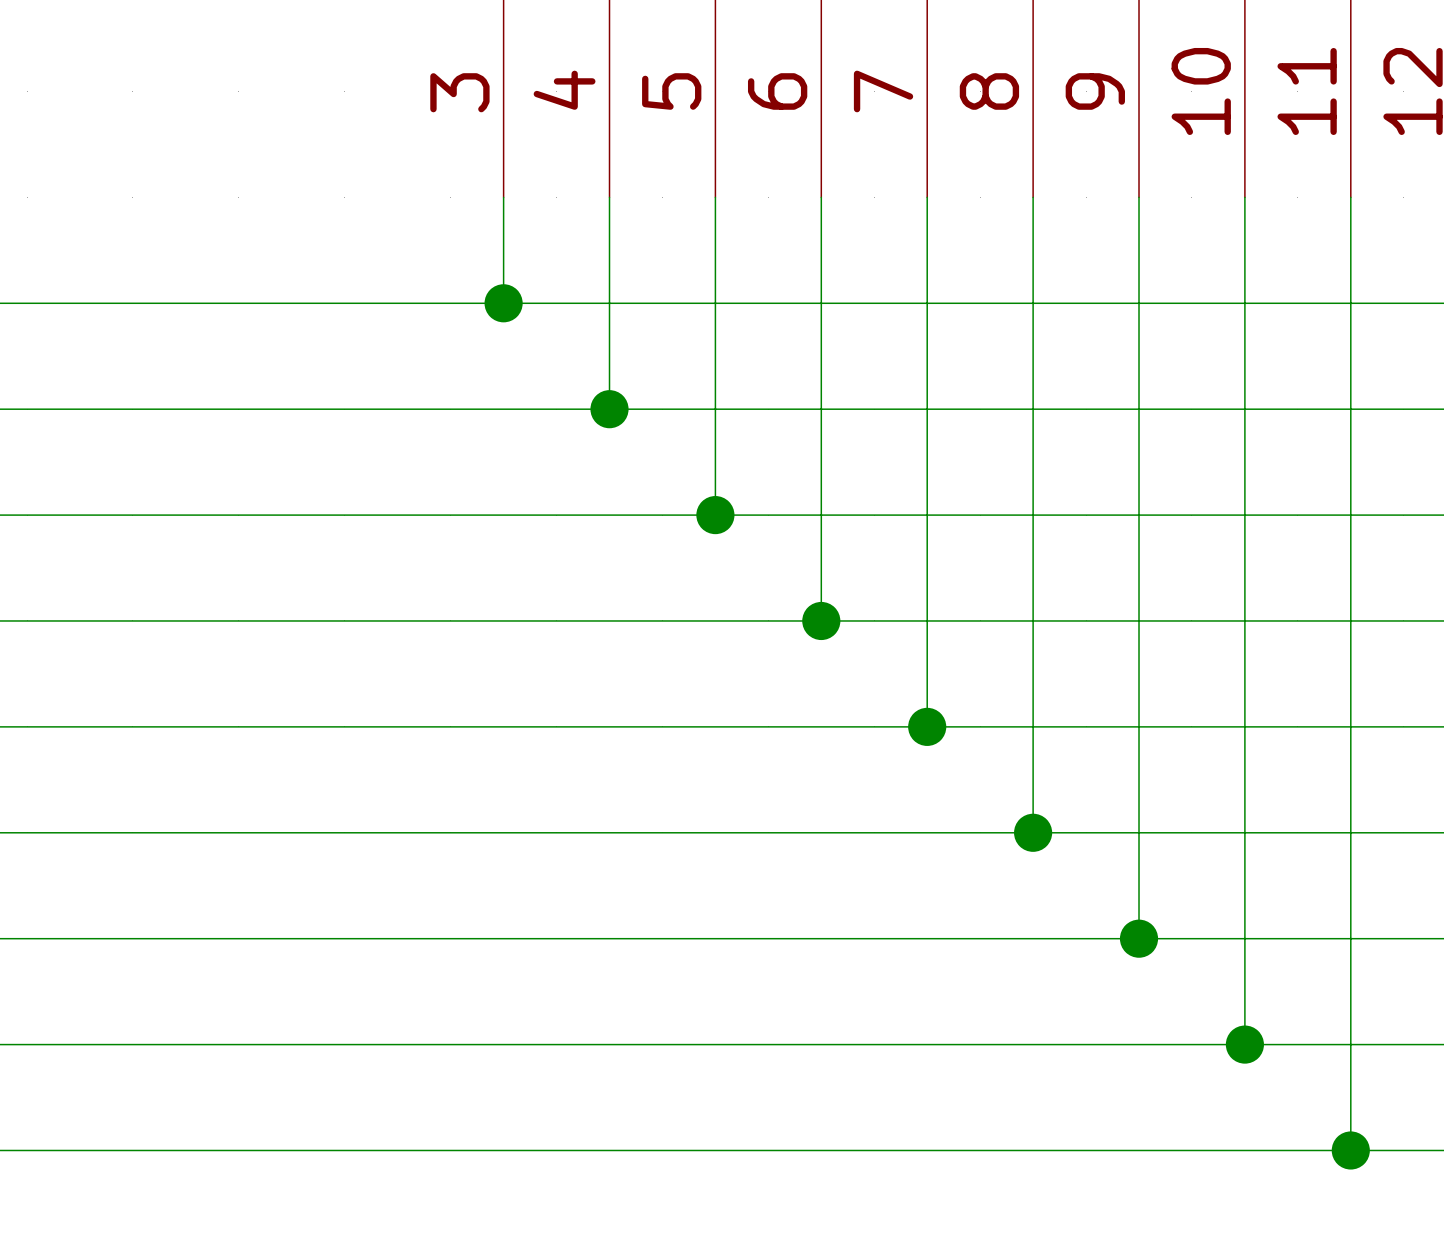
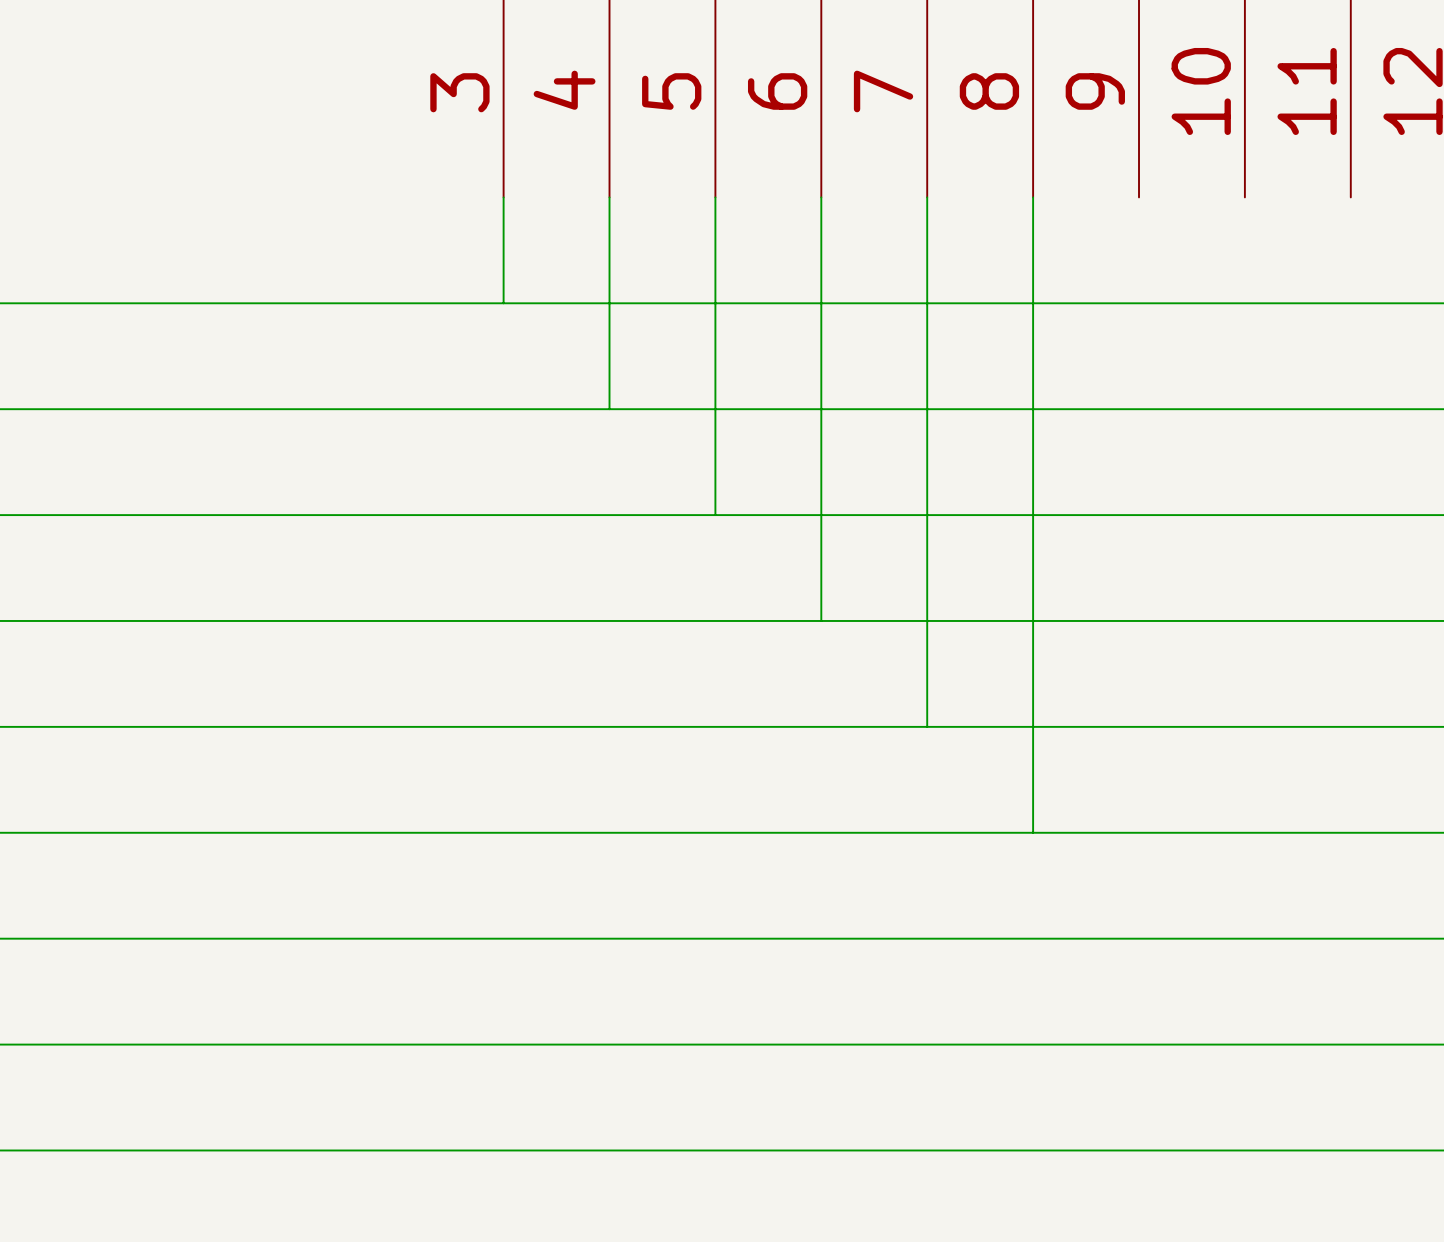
wire: (1139, 197) (1139, 938) -> none
wire: (1244, 197) (1244, 1044) -> none
wire: (1350, 197) (1350, 1150) -> none
junction: (503, 303) -> none
junction: (609, 409) -> none
junction: (715, 515) -> none
junction: (821, 620) -> none
junction: (927, 726) -> none
junction: (1033, 832) -> none
junction: (1139, 938) -> none
junction: (1244, 1044) -> none
junction: (1350, 1150) -> none

